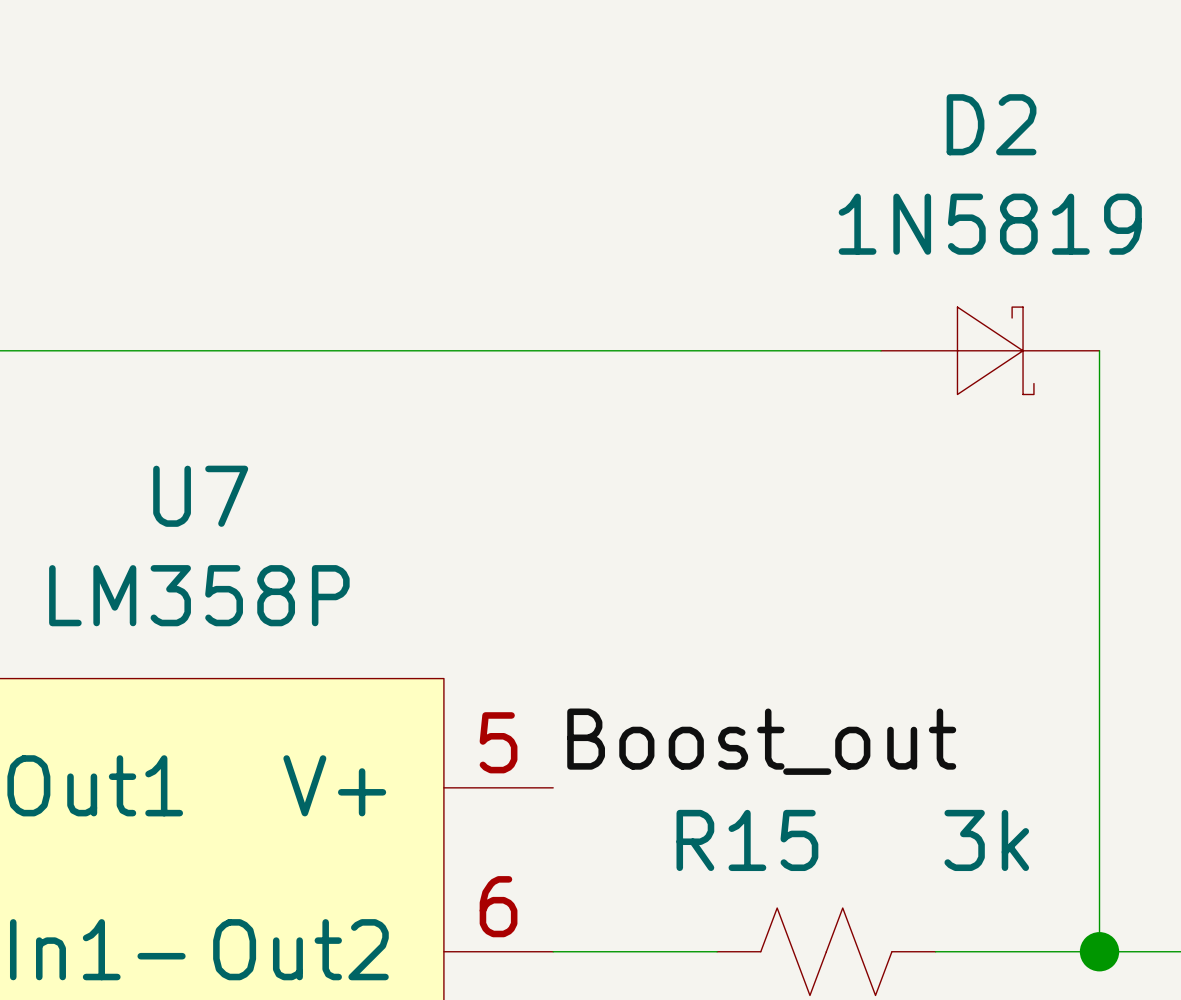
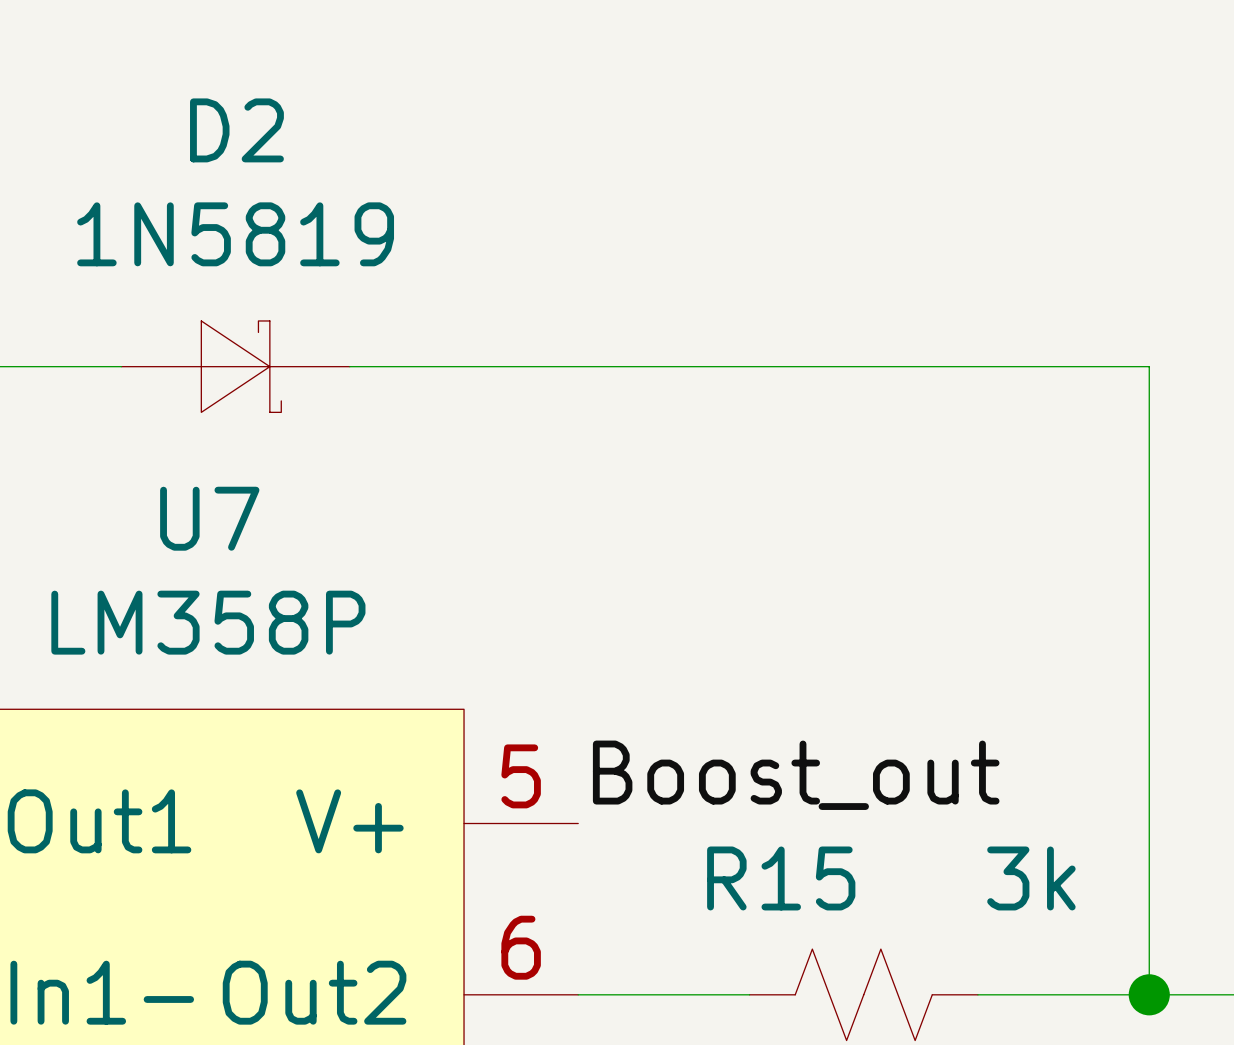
D2 position: (990, 350) -> (235, 366)

